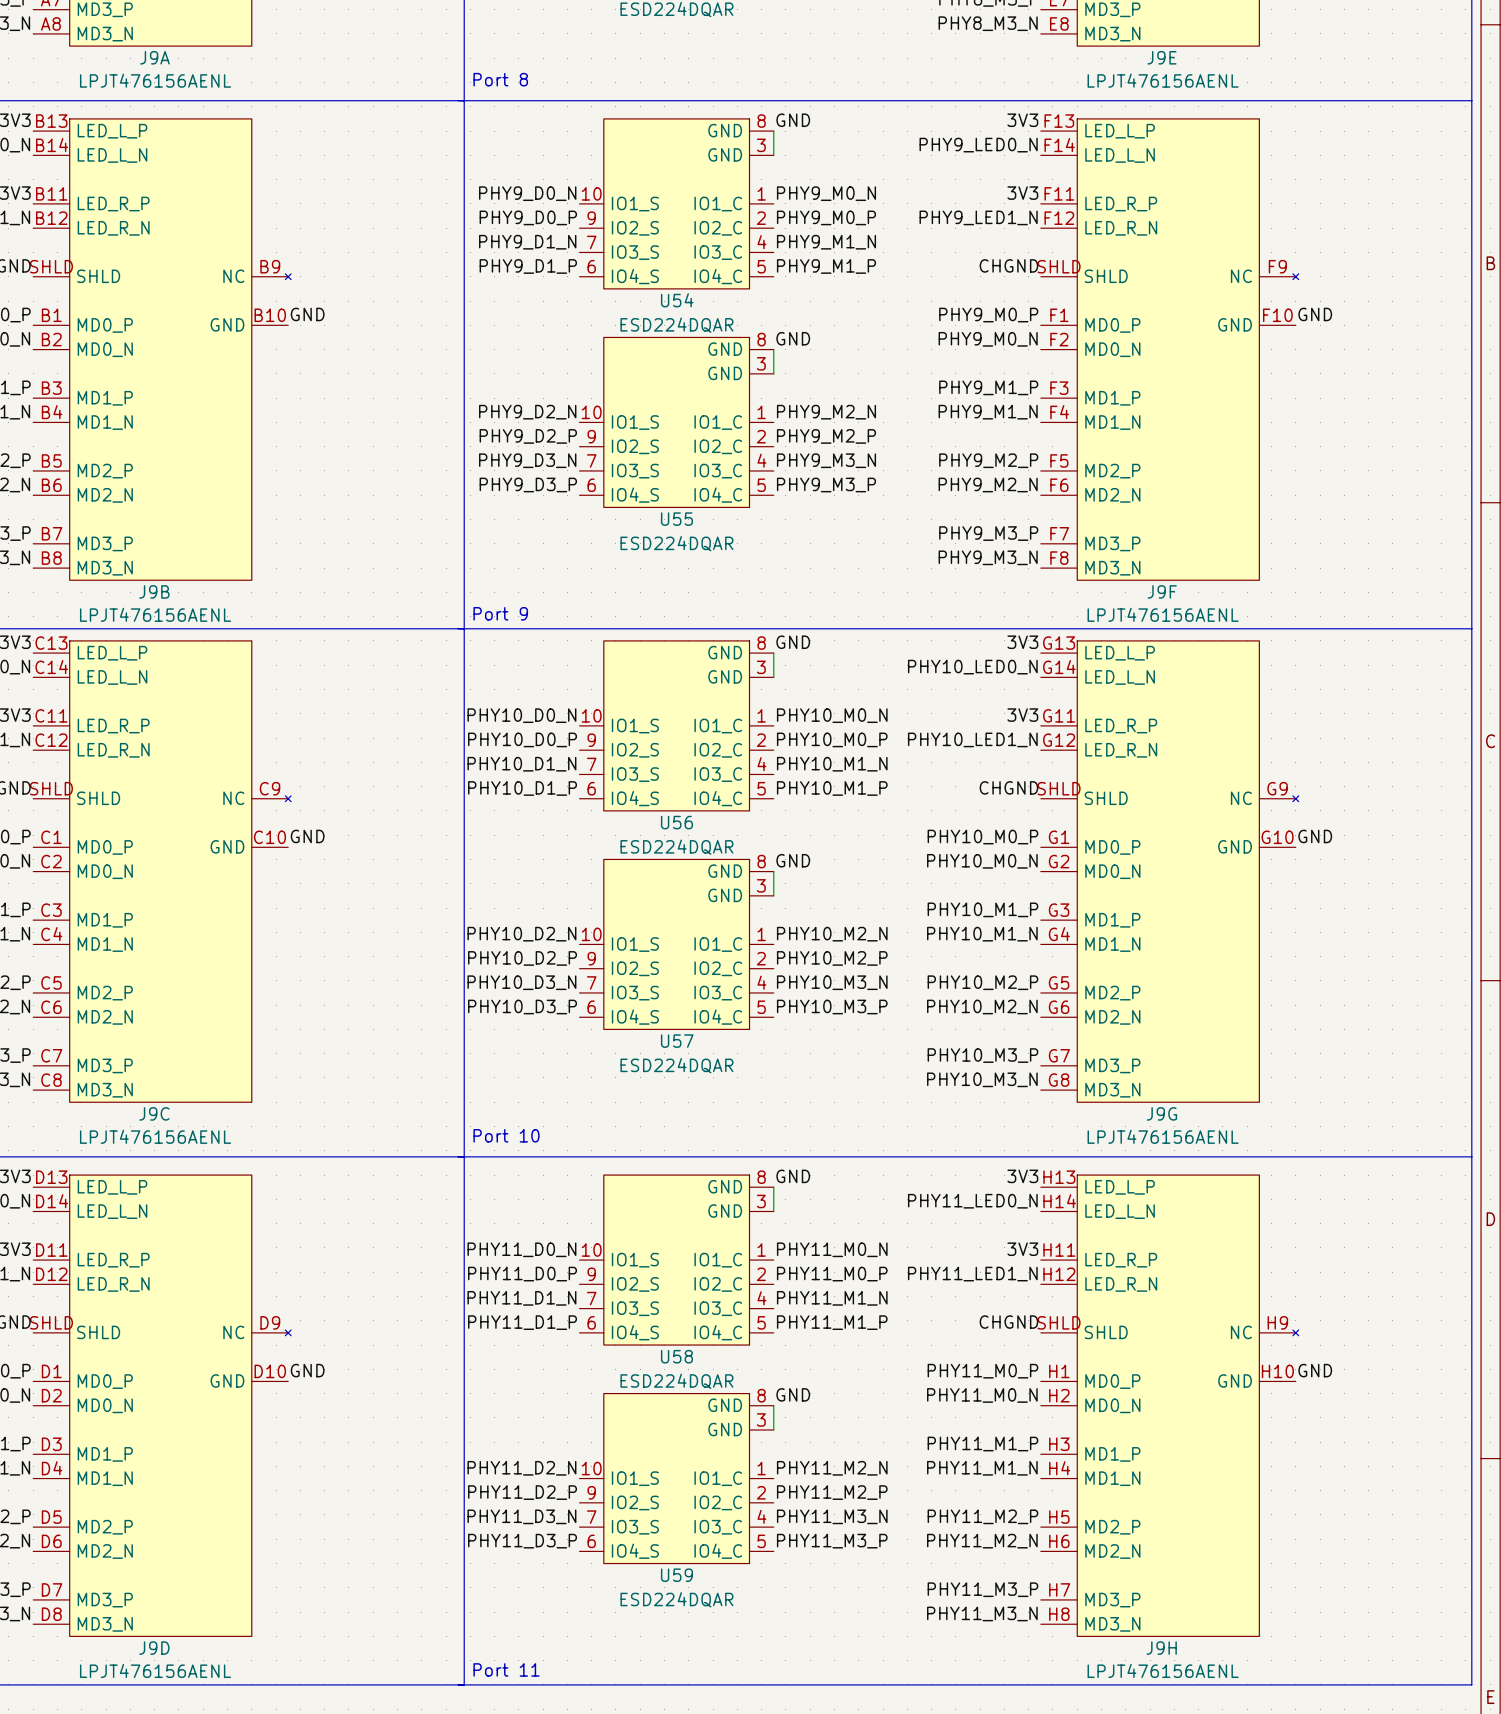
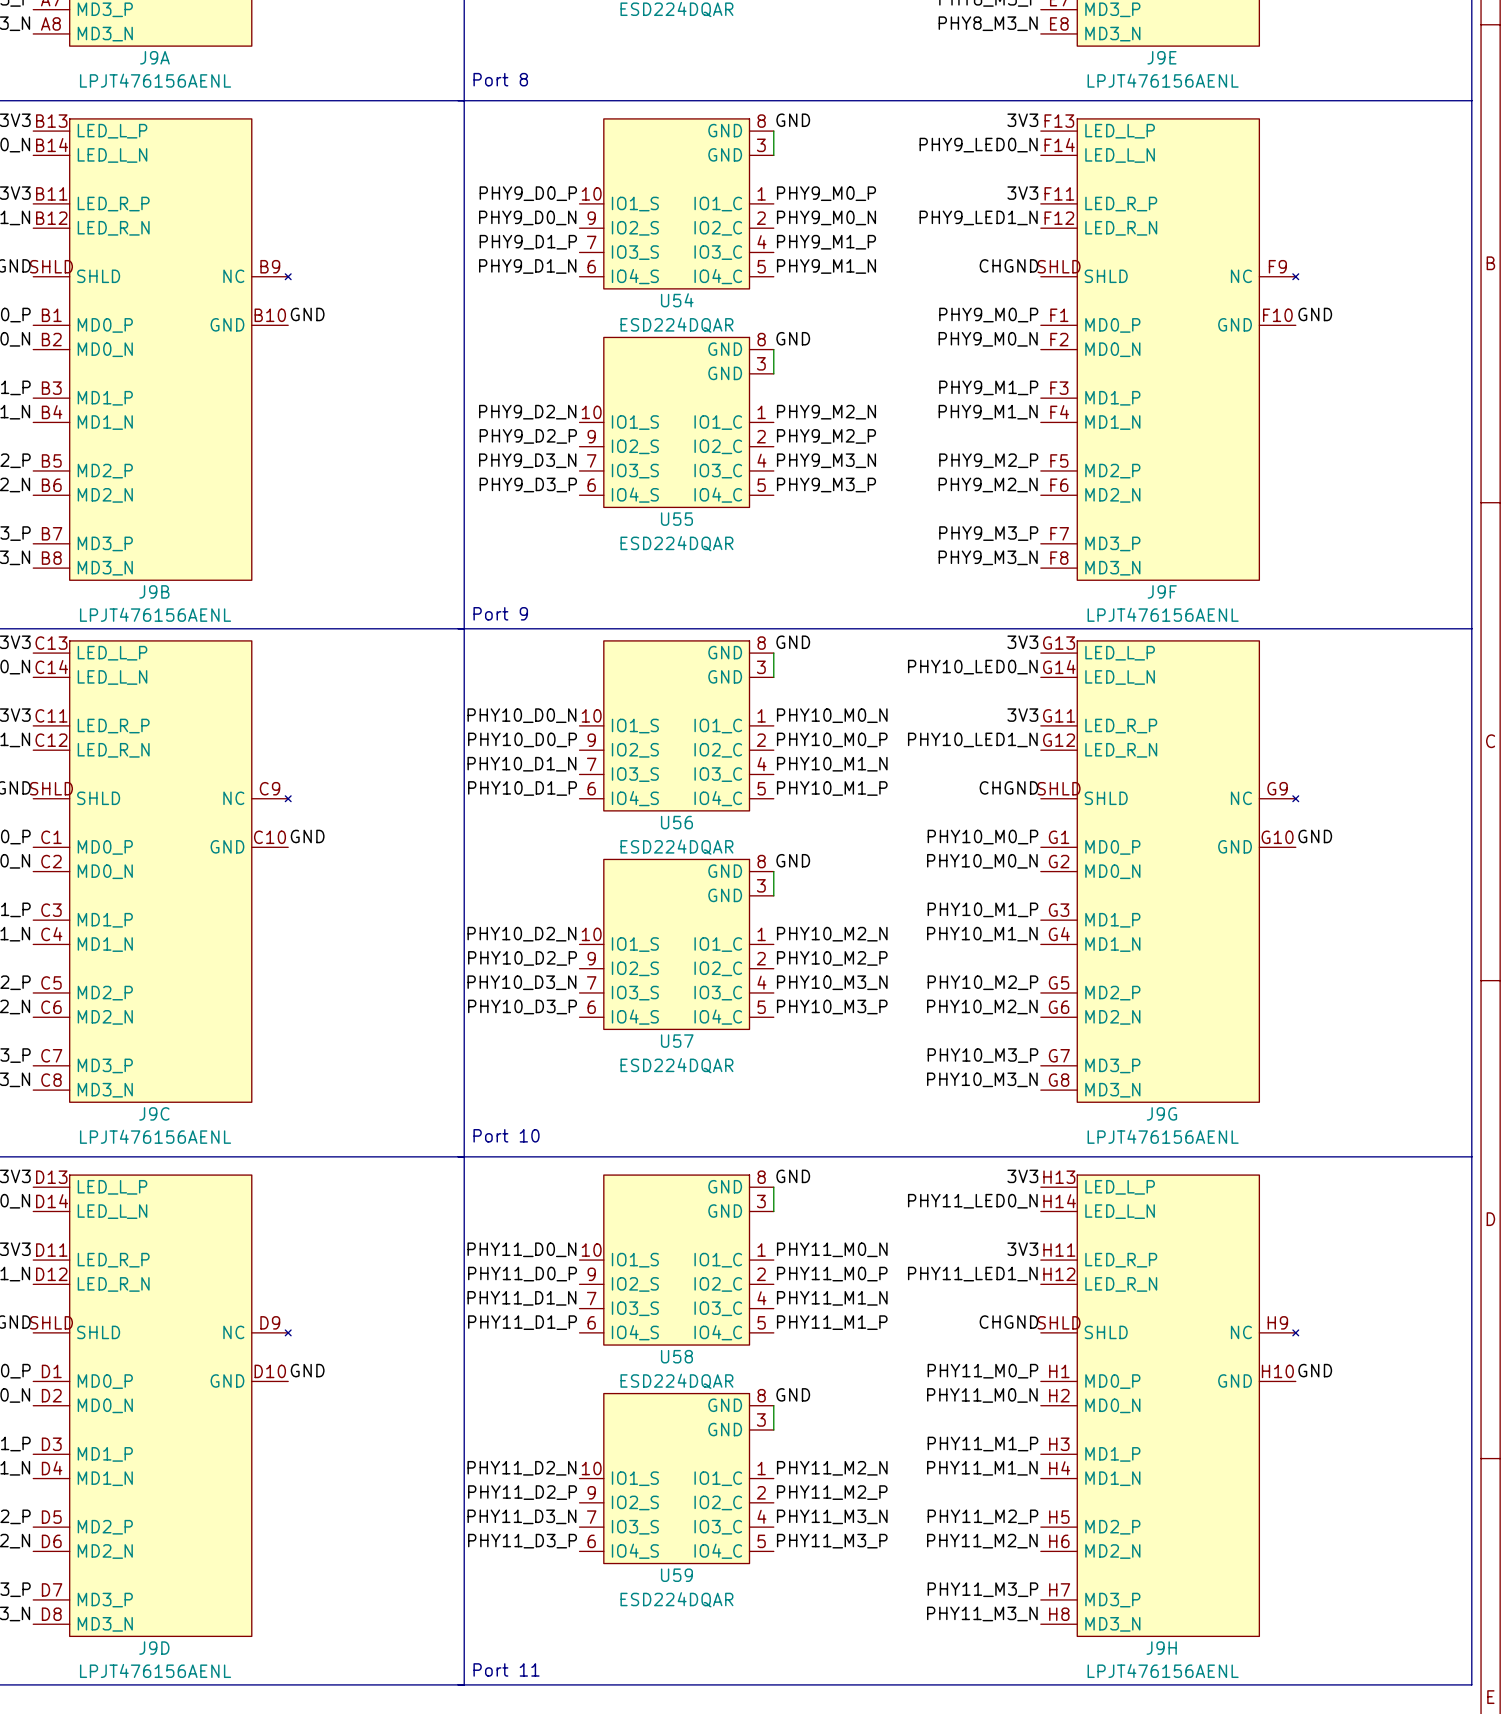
label: PHY9_D0_N (527, 193) -> PHY9_D0_P (528, 193)
label: PHY9_M0_N (826, 193) -> PHY9_M0_P (826, 193)
label: PHY9_D0_P (528, 217) -> PHY9_D0_N (527, 217)
label: PHY9_M0_P (826, 217) -> PHY9_M0_N (826, 217)
label: PHY9_D1_N (527, 242) -> PHY9_D1_P (528, 242)
label: PHY9_M1_N (826, 242) -> PHY9_M1_P (826, 242)
label: PHY9_D1_P (528, 266) -> PHY9_D1_N (527, 266)
label: PHY9_M1_P (826, 266) -> PHY9_M1_N (826, 266)

